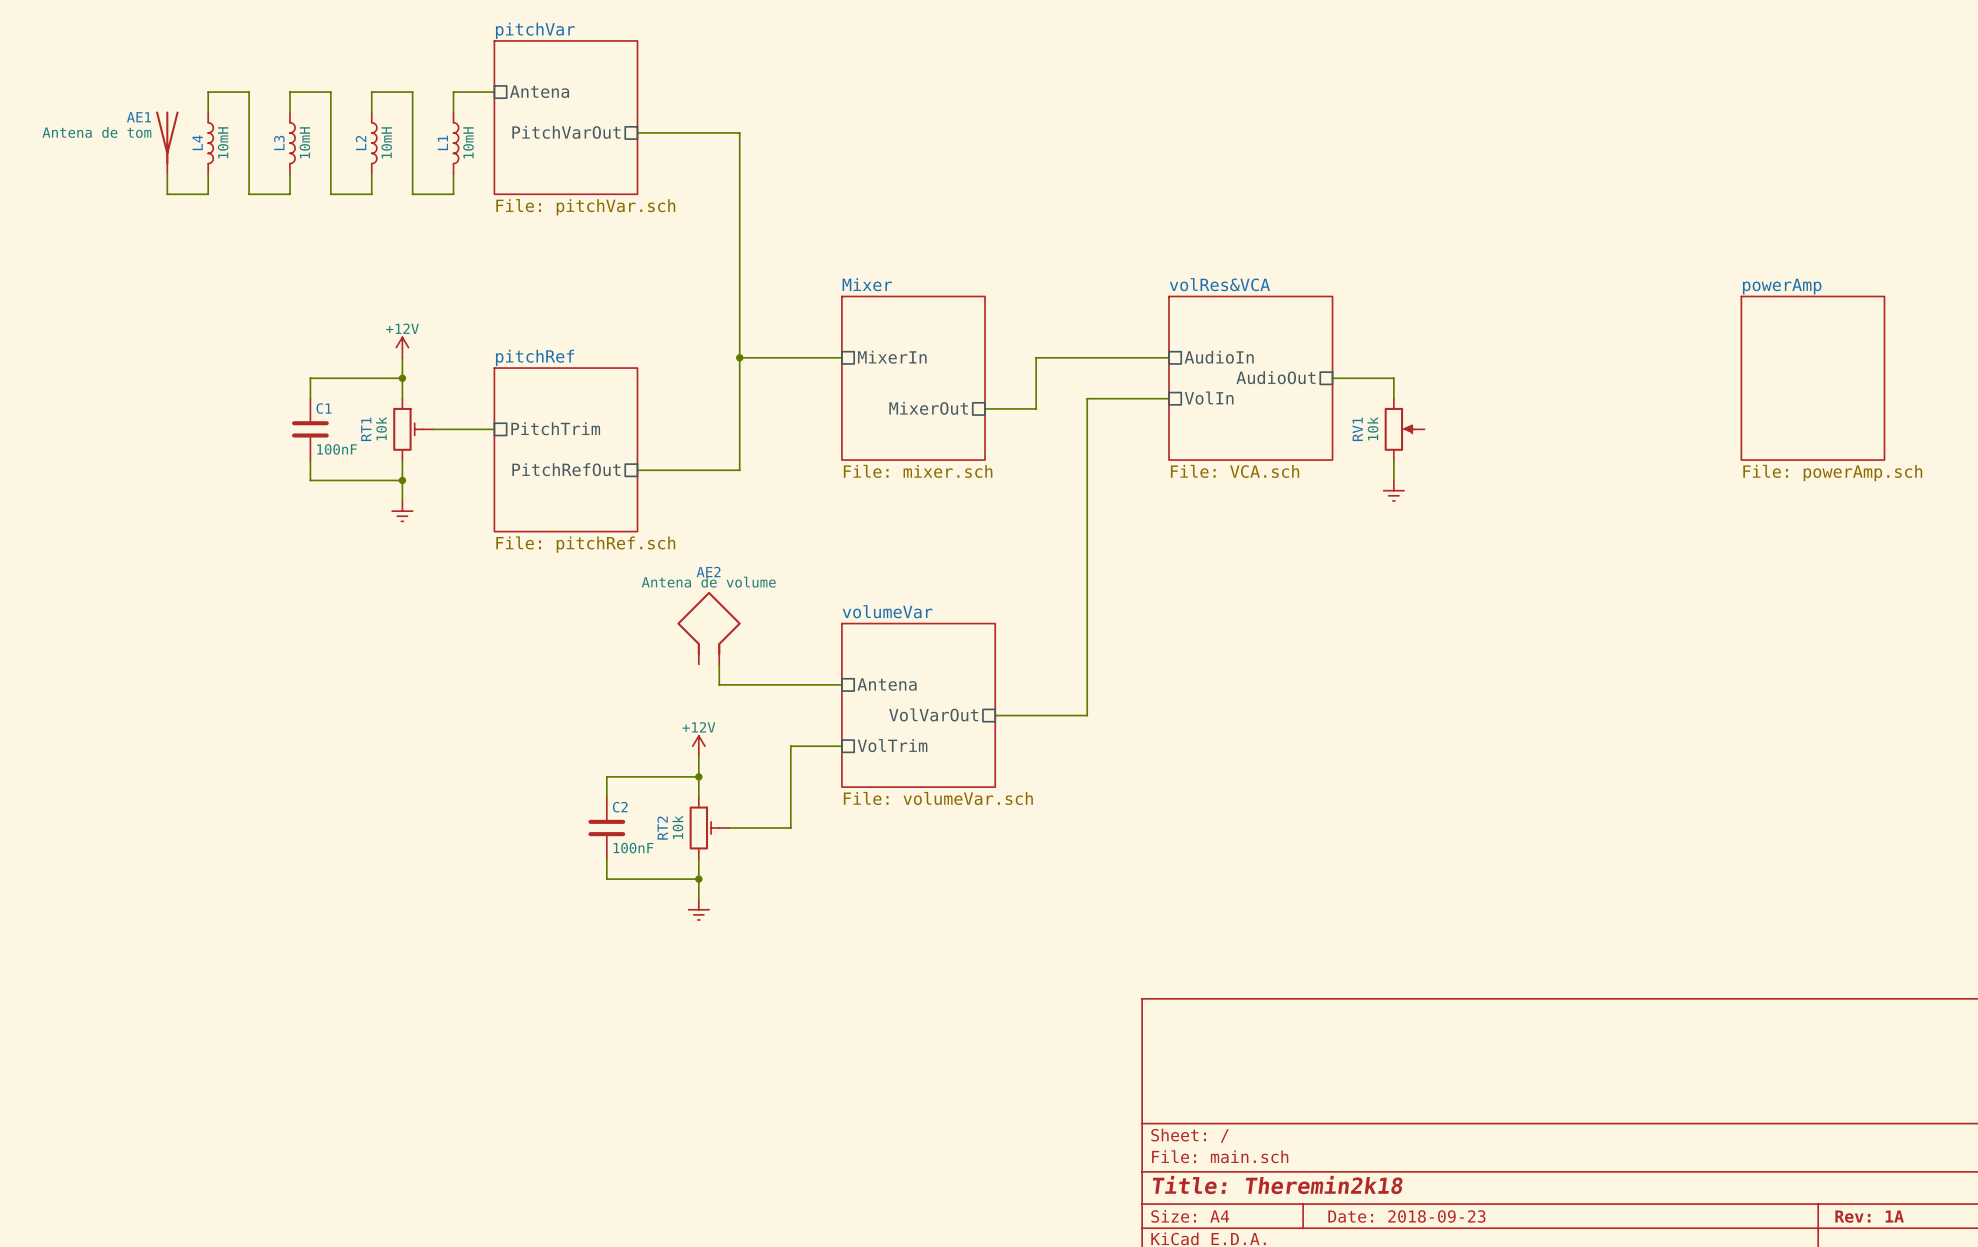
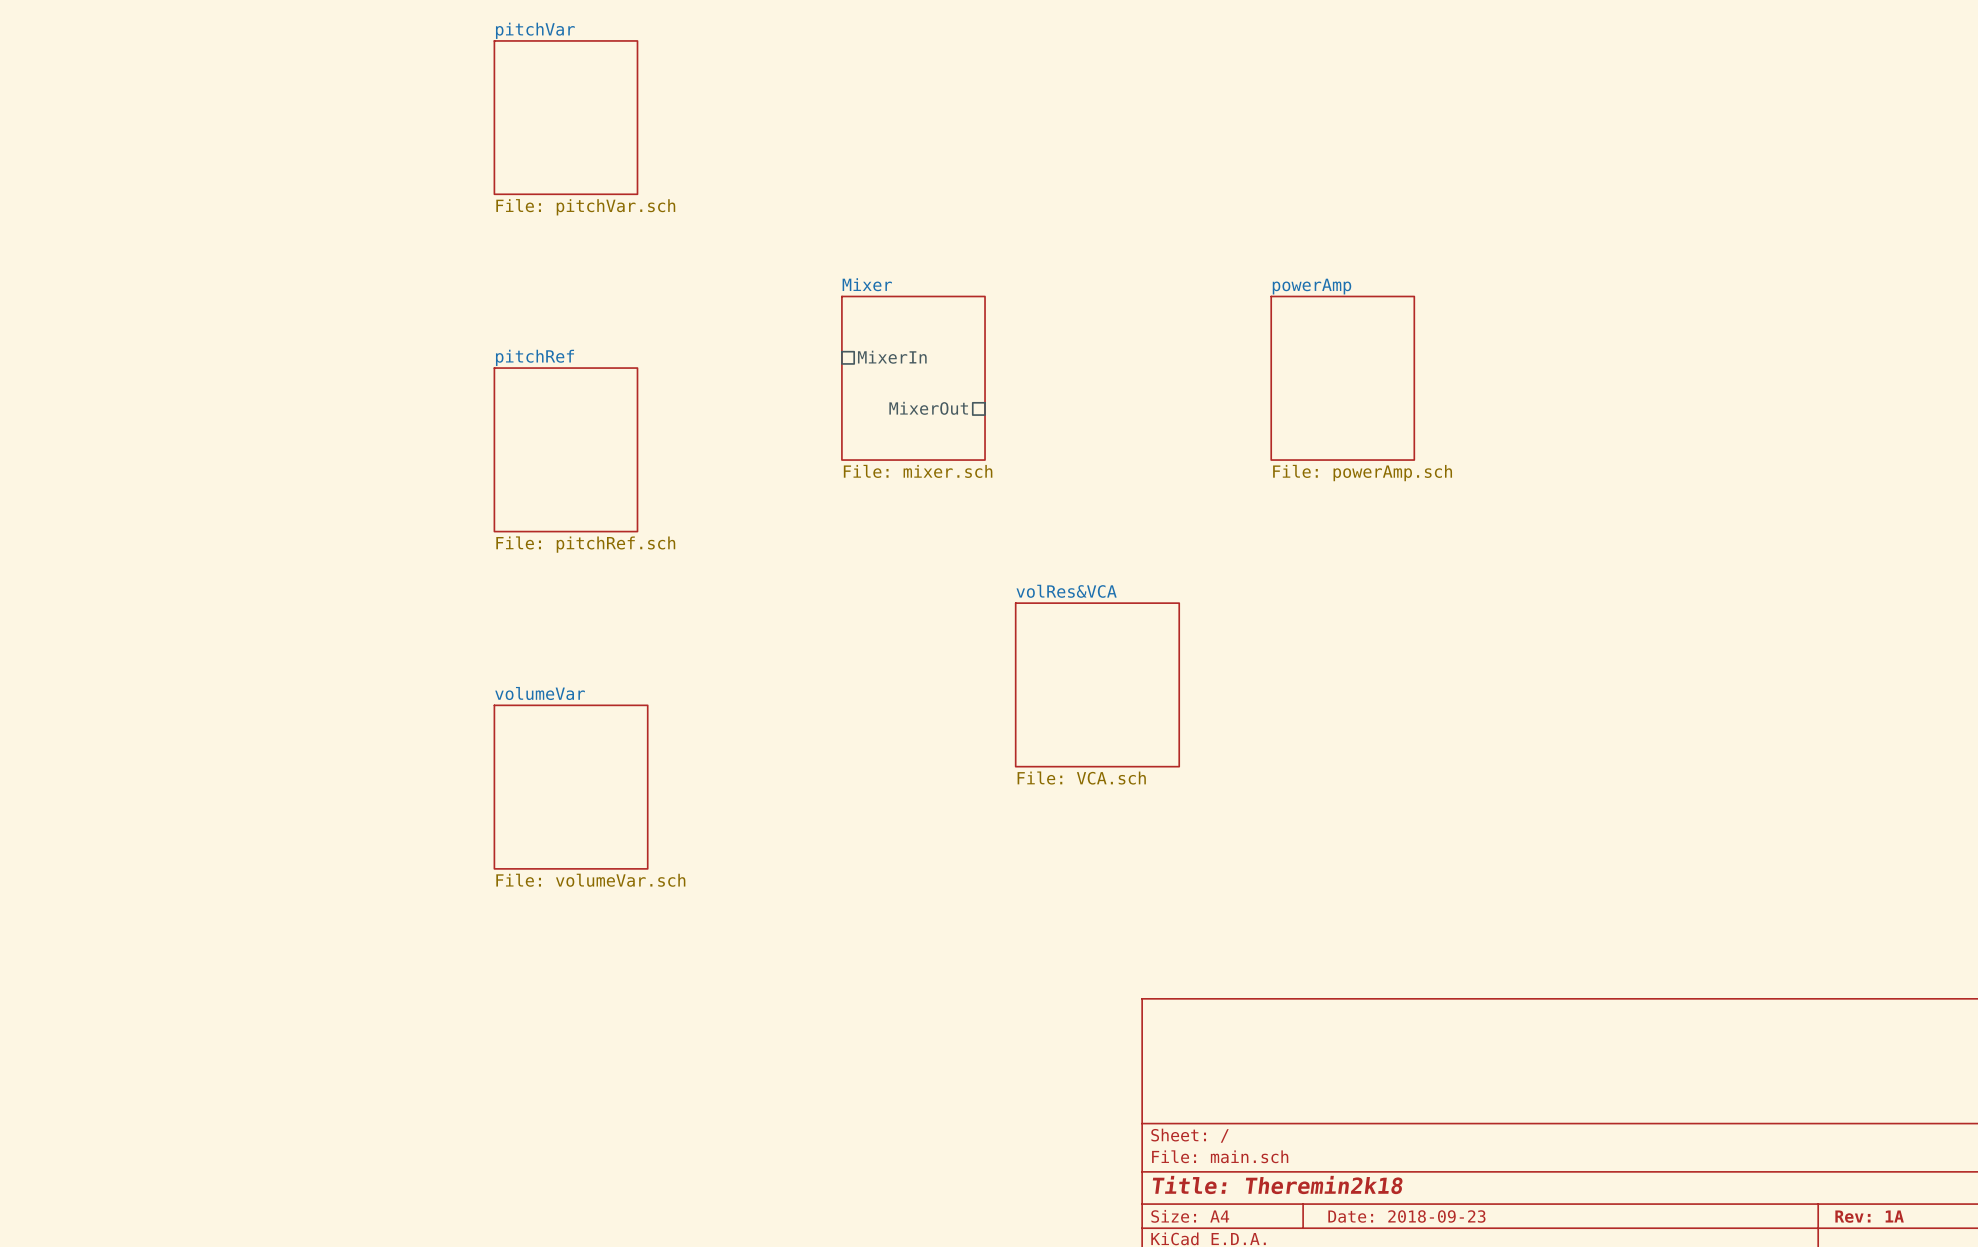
sheet pin: Antena (539, 91) -> none
wire: (494, 92) (453, 92) (453, 112) -> none
wire: (208, 112) (208, 92) (249, 92) (249, 194) (289, 194) (289, 173) -> none
wire: (289, 112) (289, 92) (330, 92) (330, 194) (371, 194) (371, 173) -> none
wire: (371, 112) (371, 92) (412, 92) (412, 194) (453, 194) (453, 173) -> none
sheet pin: PitchVarOut (566, 132) -> none
wire: (637, 132) (739, 132) (739, 470) (637, 470) -> none
AE1: Antena de tom (167, 142) -> none
L4: 10mH (210, 143) -> none
L3: 10mH (292, 143) -> none
L2: 10mH (374, 143) -> none
L1: 10mH (456, 143) -> none
wire: (167, 173) (167, 194) (208, 194) (208, 173) -> none
power symbol: +12V (402, 347) -> none
wire: (402, 357) (402, 398) -> none
wire: (739, 357) (841, 357) -> none
junction: (739, 357) -> none
wire: (1169, 357) (1036, 357) (1036, 408) (985, 408) -> none
sheet pin: AudioIn (1219, 357) -> none
sheet pin: AudioOut (1276, 377) -> none
wire: (402, 378) (310, 378) (310, 398) -> none
junction: (402, 378) -> none
sheet volRes&VCA: File: VCA.sch (1250, 378) -> none
wire: (1332, 378) (1393, 378) (1393, 398) -> none
sheet powerAmp: none -> File: powerAmp.sch (1342, 378)
sheet powerAmp: File: powerAmp.sch (1812, 378) -> none
wire: (1169, 398) (1087, 398) (1087, 715) (995, 715) -> none
sheet pin: VolIn (1209, 398) -> none
sheet pin: PitchTrim (555, 428) -> none
C1: 100nF (310, 429) -> none
RT1: 10k (413, 429) -> none
wire: (433, 429) (494, 429) -> none
RV1: 10k (1404, 429) -> none
wire: (310, 460) (310, 480) (402, 480) -> none
wire: (402, 460) (402, 500) -> none
wire: (1393, 460) (1393, 480) -> none
sheet pin: PitchRefOut (566, 469) -> none
junction: (402, 480) -> none
power symbol: (1393, 490) -> none
power symbol: (402, 511) -> none
AE2: Antena de volume (709, 628) -> none
wire: (719, 664) (719, 684) (841, 684) -> none
sheet pin: Antena (887, 684) -> none
sheet volRes&VCA: none -> File: VCA.sch (1097, 684)
sheet volumeVar: File: volumeVar.sch (918, 705) -> none
sheet pin: VolVarOut (933, 714) -> none
sheet pin: VolTrim (892, 745) -> none
power symbol: +12V (698, 746) -> none
wire: (841, 746) (790, 746) (790, 827) (729, 827) -> none
wire: (698, 756) (698, 797) -> none
wire: (698, 776) (606, 776) (606, 797) -> none
junction: (698, 776) -> none
sheet volumeVar: none -> File: volumeVar.sch (571, 787)
C2: 100nF (606, 827) -> none
RT2: 10k (709, 827) -> none
wire: (606, 858) (606, 879) (698, 879) -> none
wire: (698, 858) (698, 899) -> none
junction: (698, 879) -> none
power symbol: (698, 909) -> none

